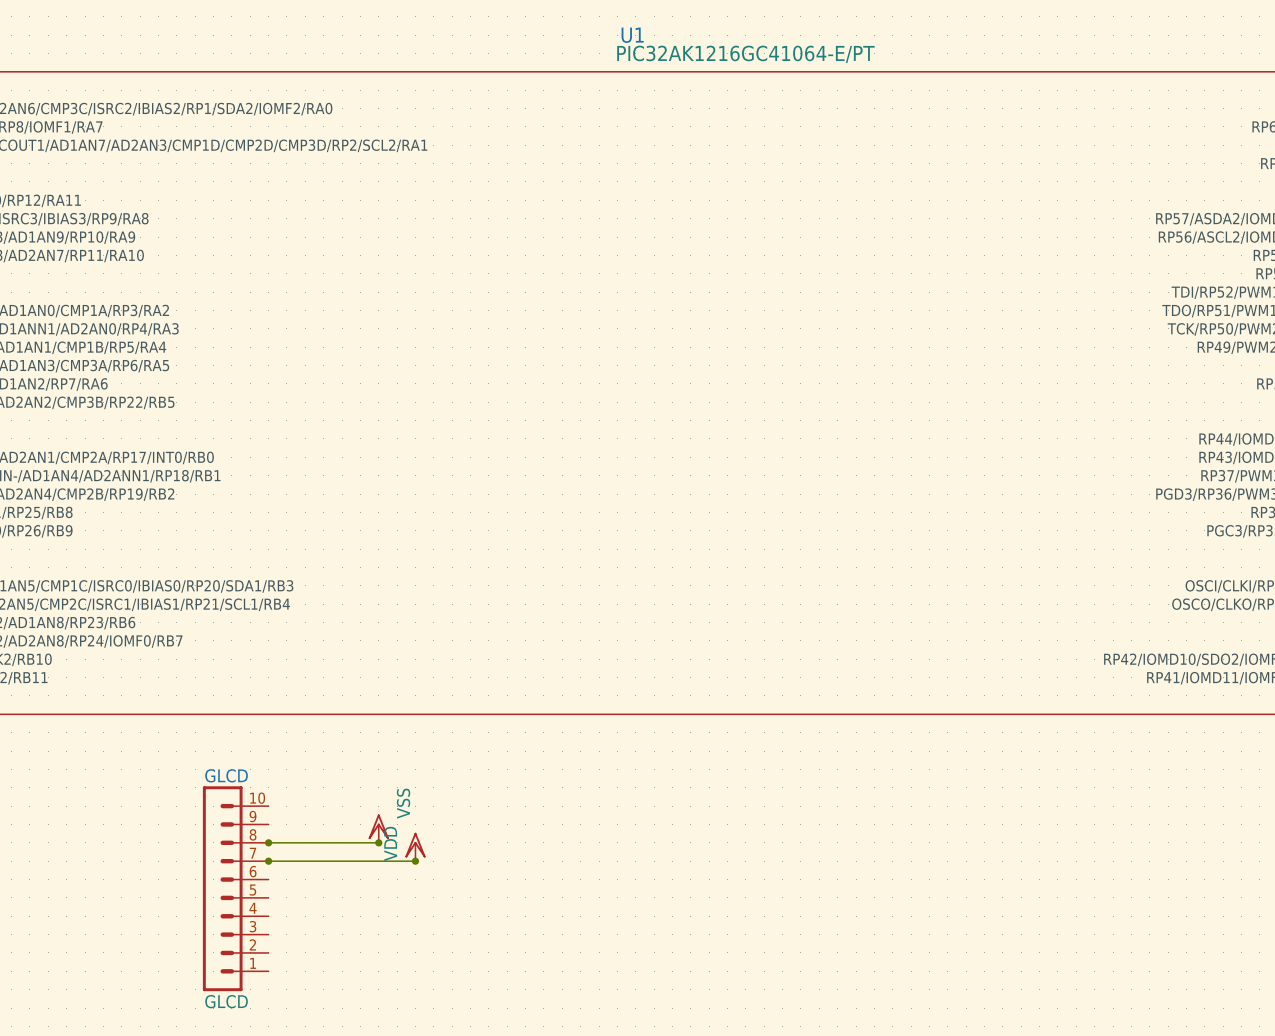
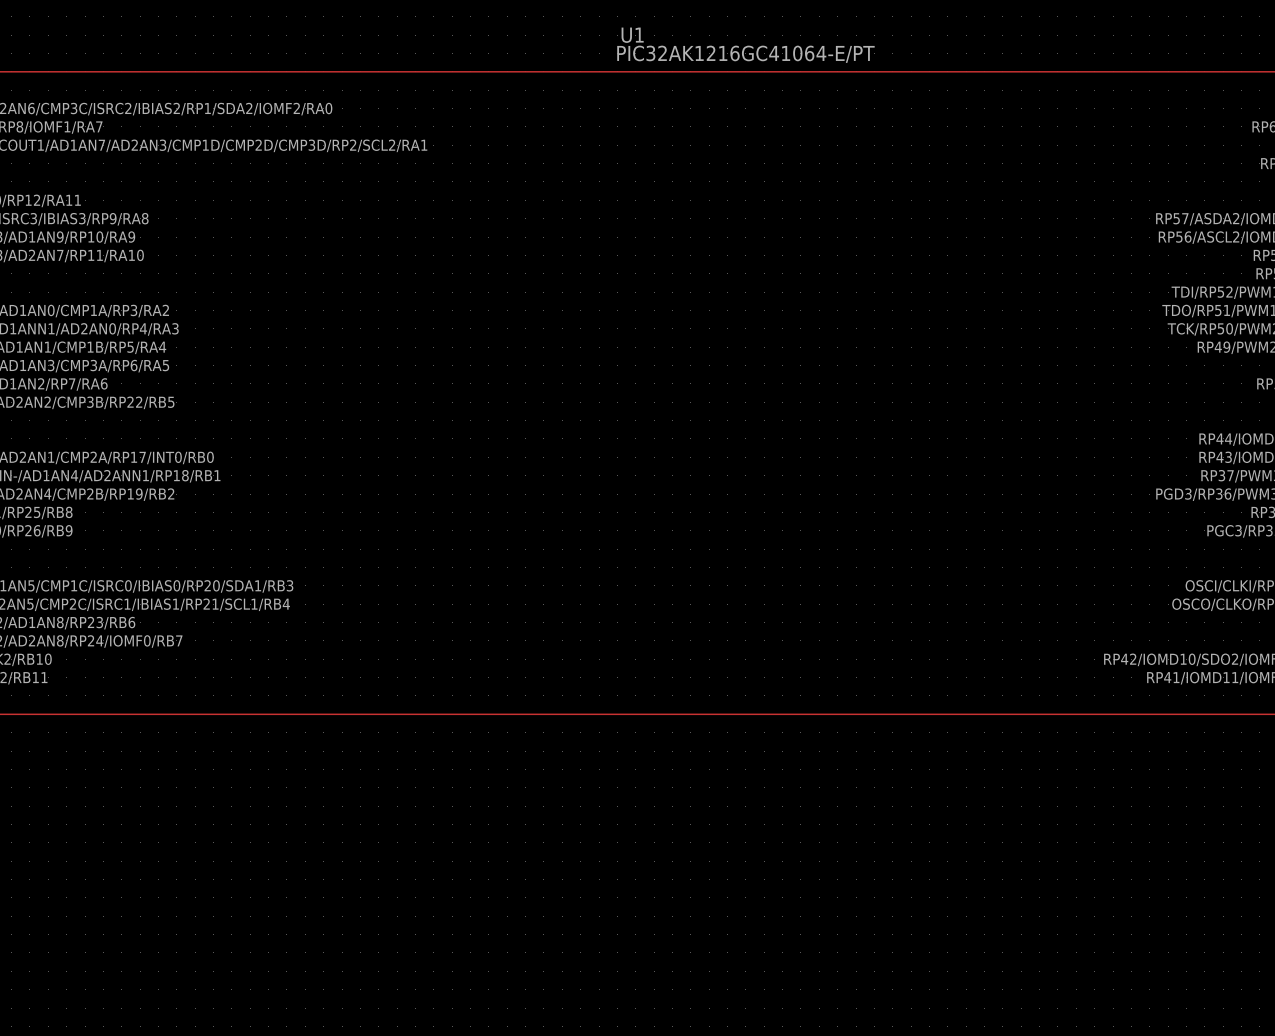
power symbol: VSS (378, 828) -> none
wire: (268, 842) (378, 842) -> none
junction: (268, 842) -> none
junction: (378, 842) -> none
power symbol: VDD (415, 846) -> none
wire: (268, 861) (415, 861) -> none
junction: (268, 861) -> none
junction: (415, 861) -> none
GLCD: GLCD (235, 888) -> none

